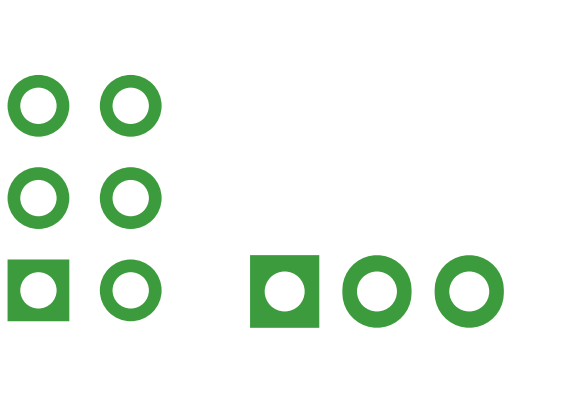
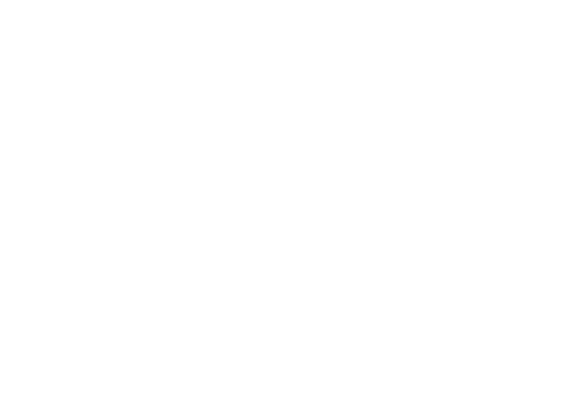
part: (84, 198) -> none
part: (376, 291) -> none

